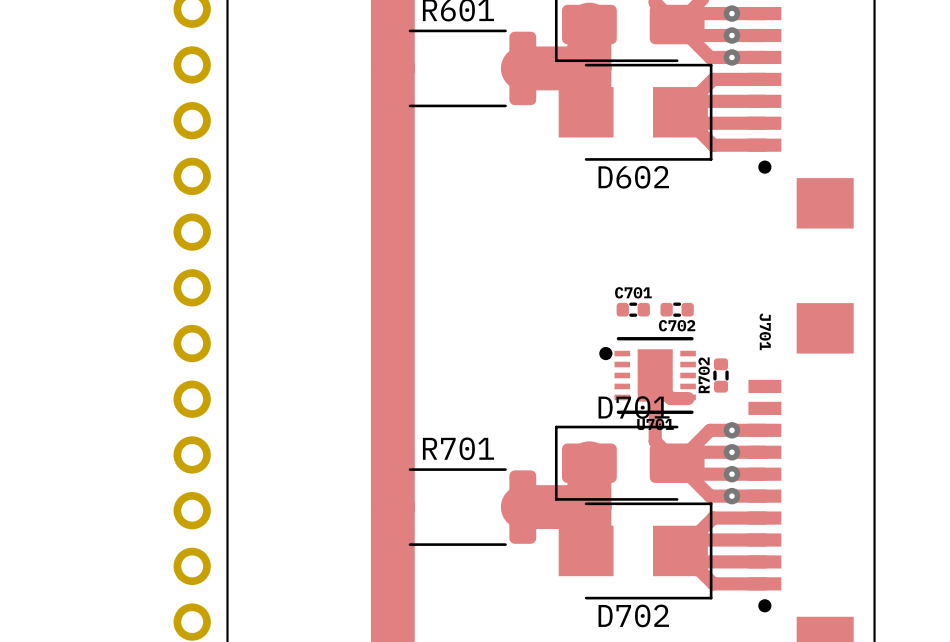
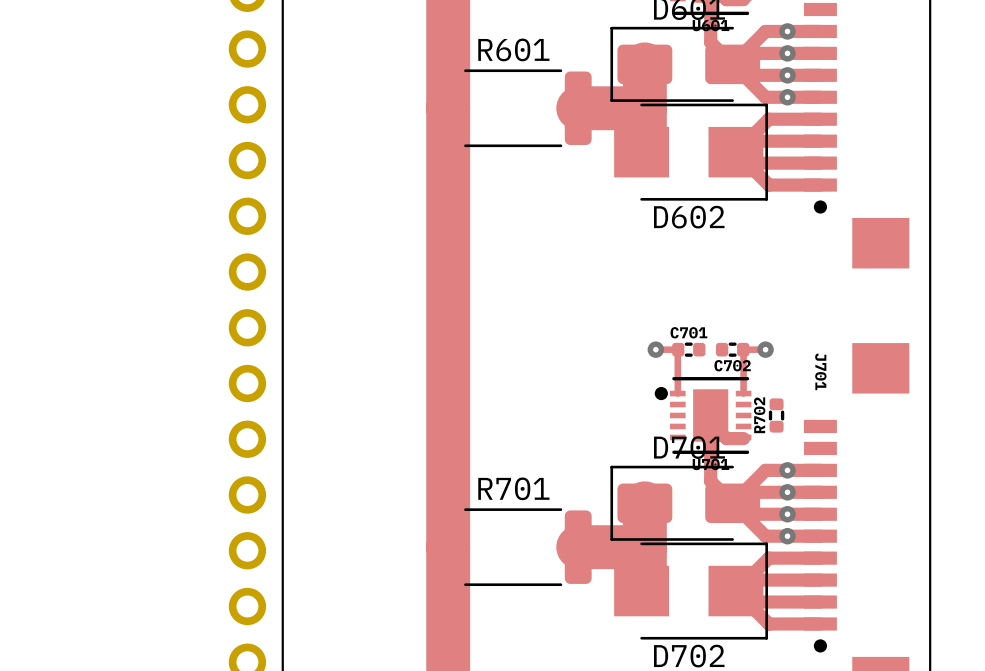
track: none -> (655, 349) (678, 349) (677, 393)
via: none -> (655, 349)
track: none -> (765, 349) (743, 349) (743, 393)
via: none -> (765, 349)

